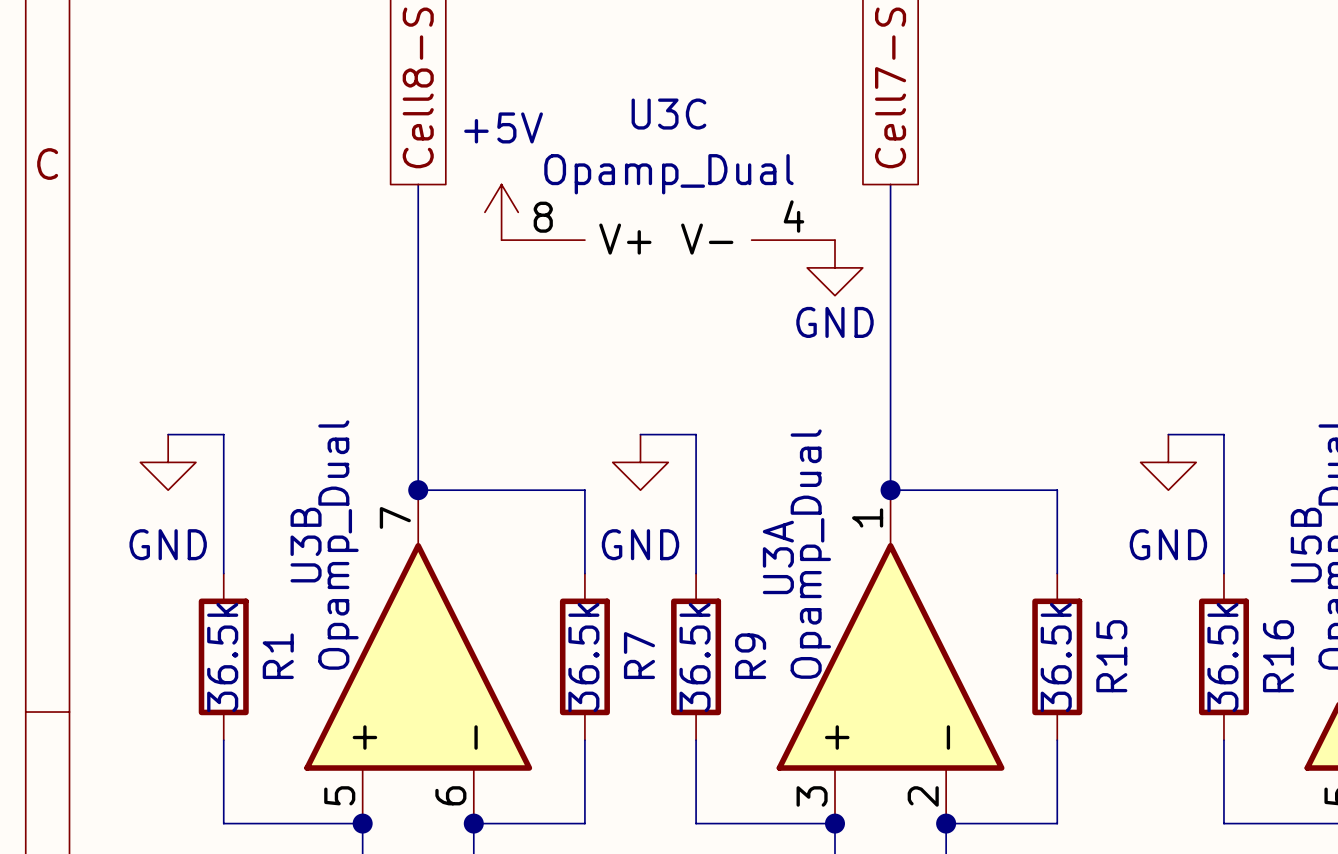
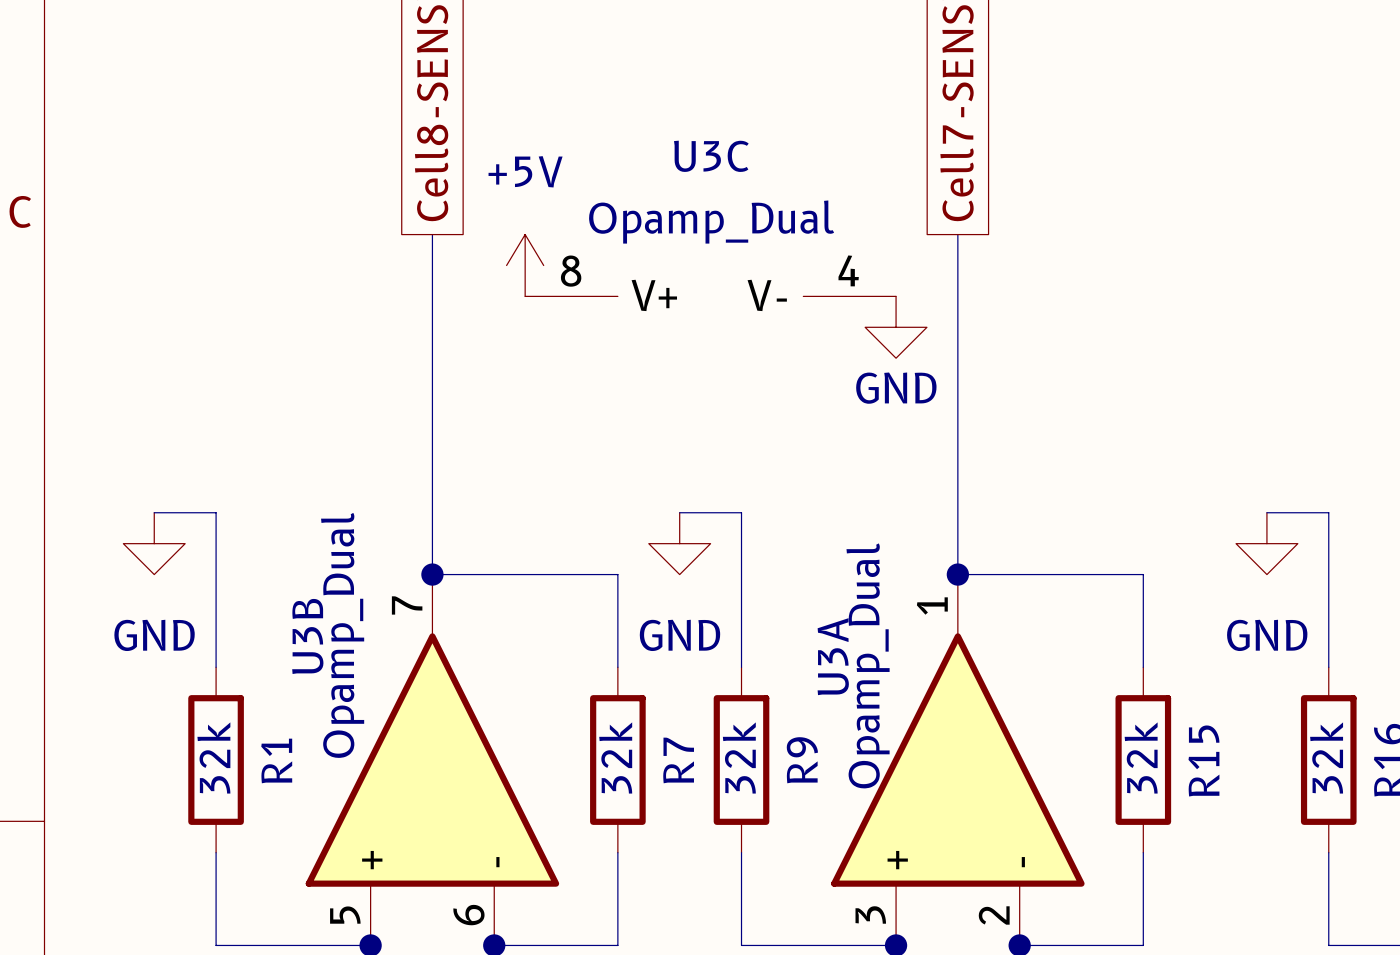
R1 value: 36.5k (222, 657) -> 32k (213, 757)
R7 value: 36.5k (583, 657) -> 32k (615, 757)
R9 value: 36.5k (695, 657) -> 32k (739, 757)
R15 value: 36.5k (1056, 657) -> 32k (1141, 757)
R16 value: 36.5k (1222, 657) -> 32k (1326, 757)

